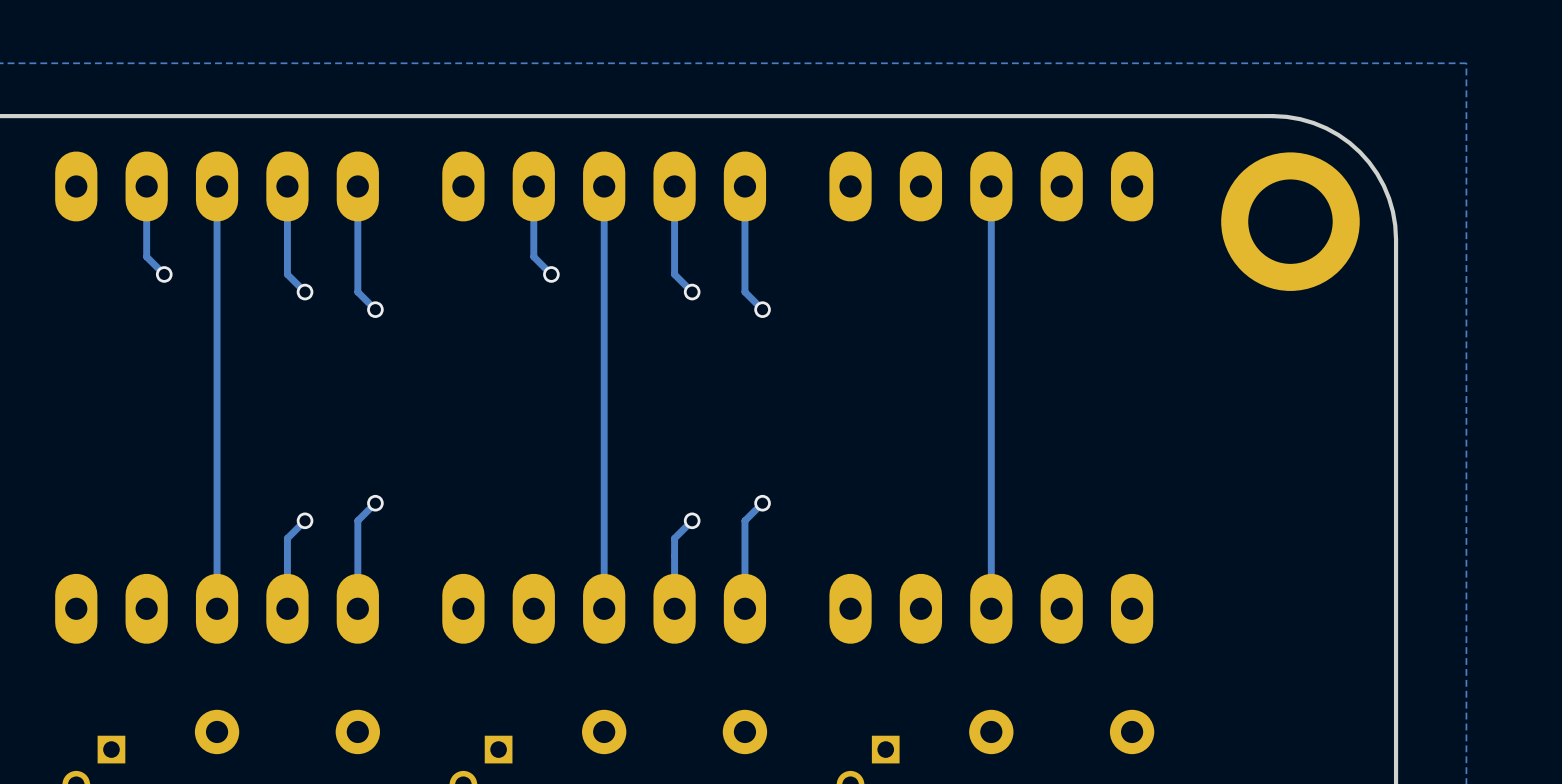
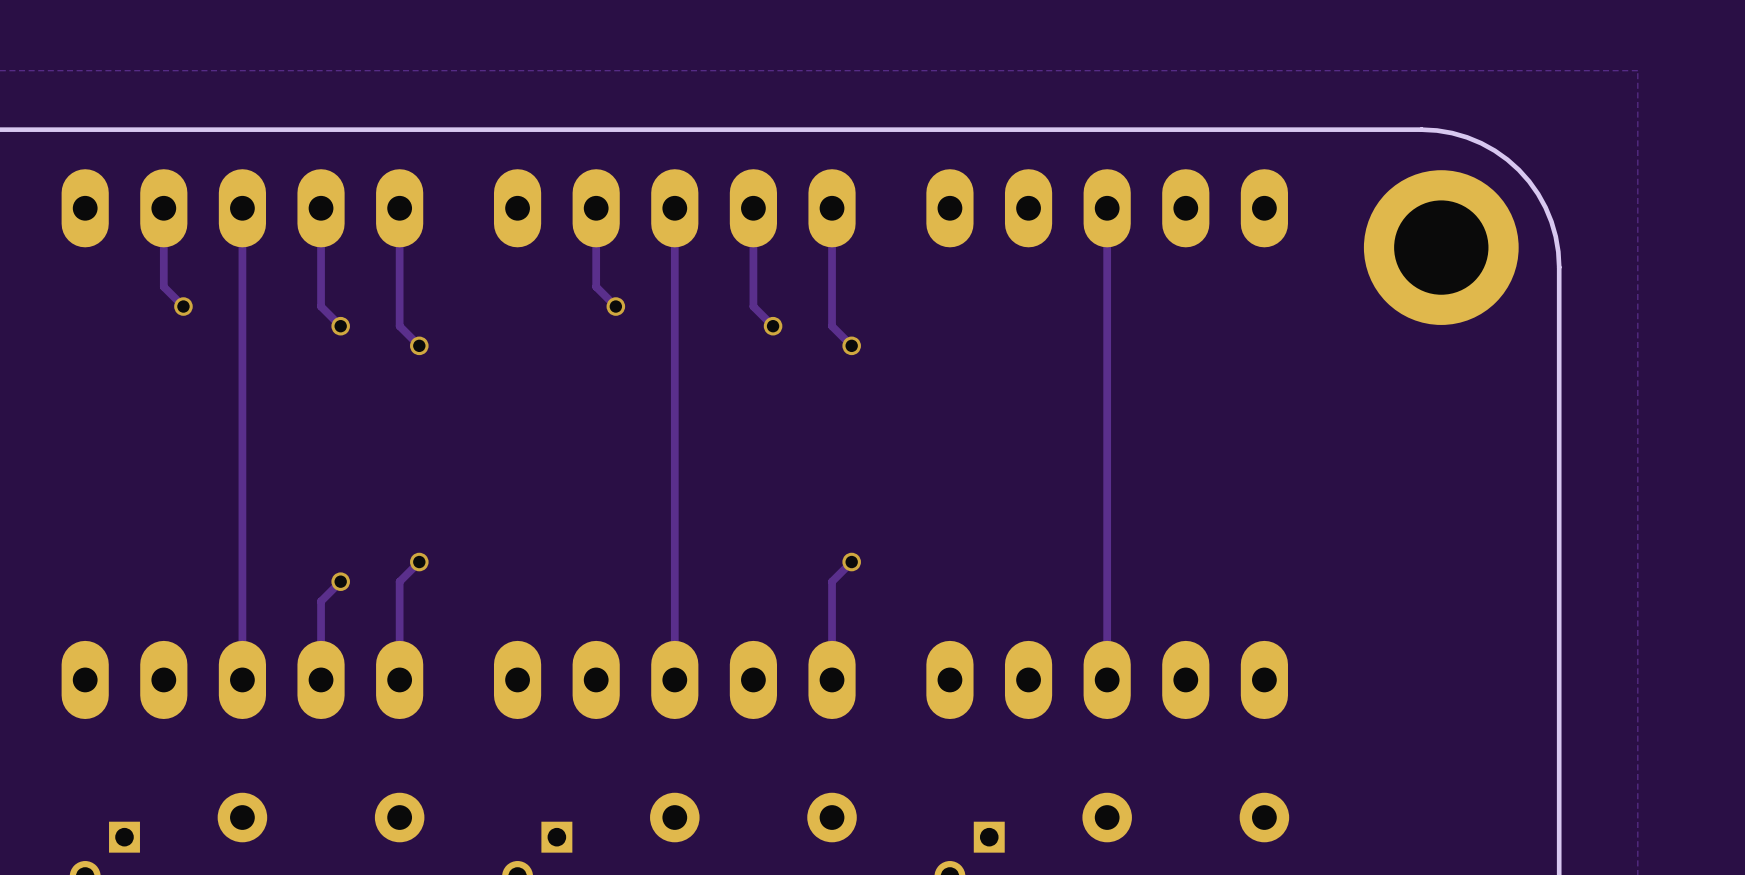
track: (692, 520) (674, 538) (674, 608) -> none
via: (692, 520) -> none

